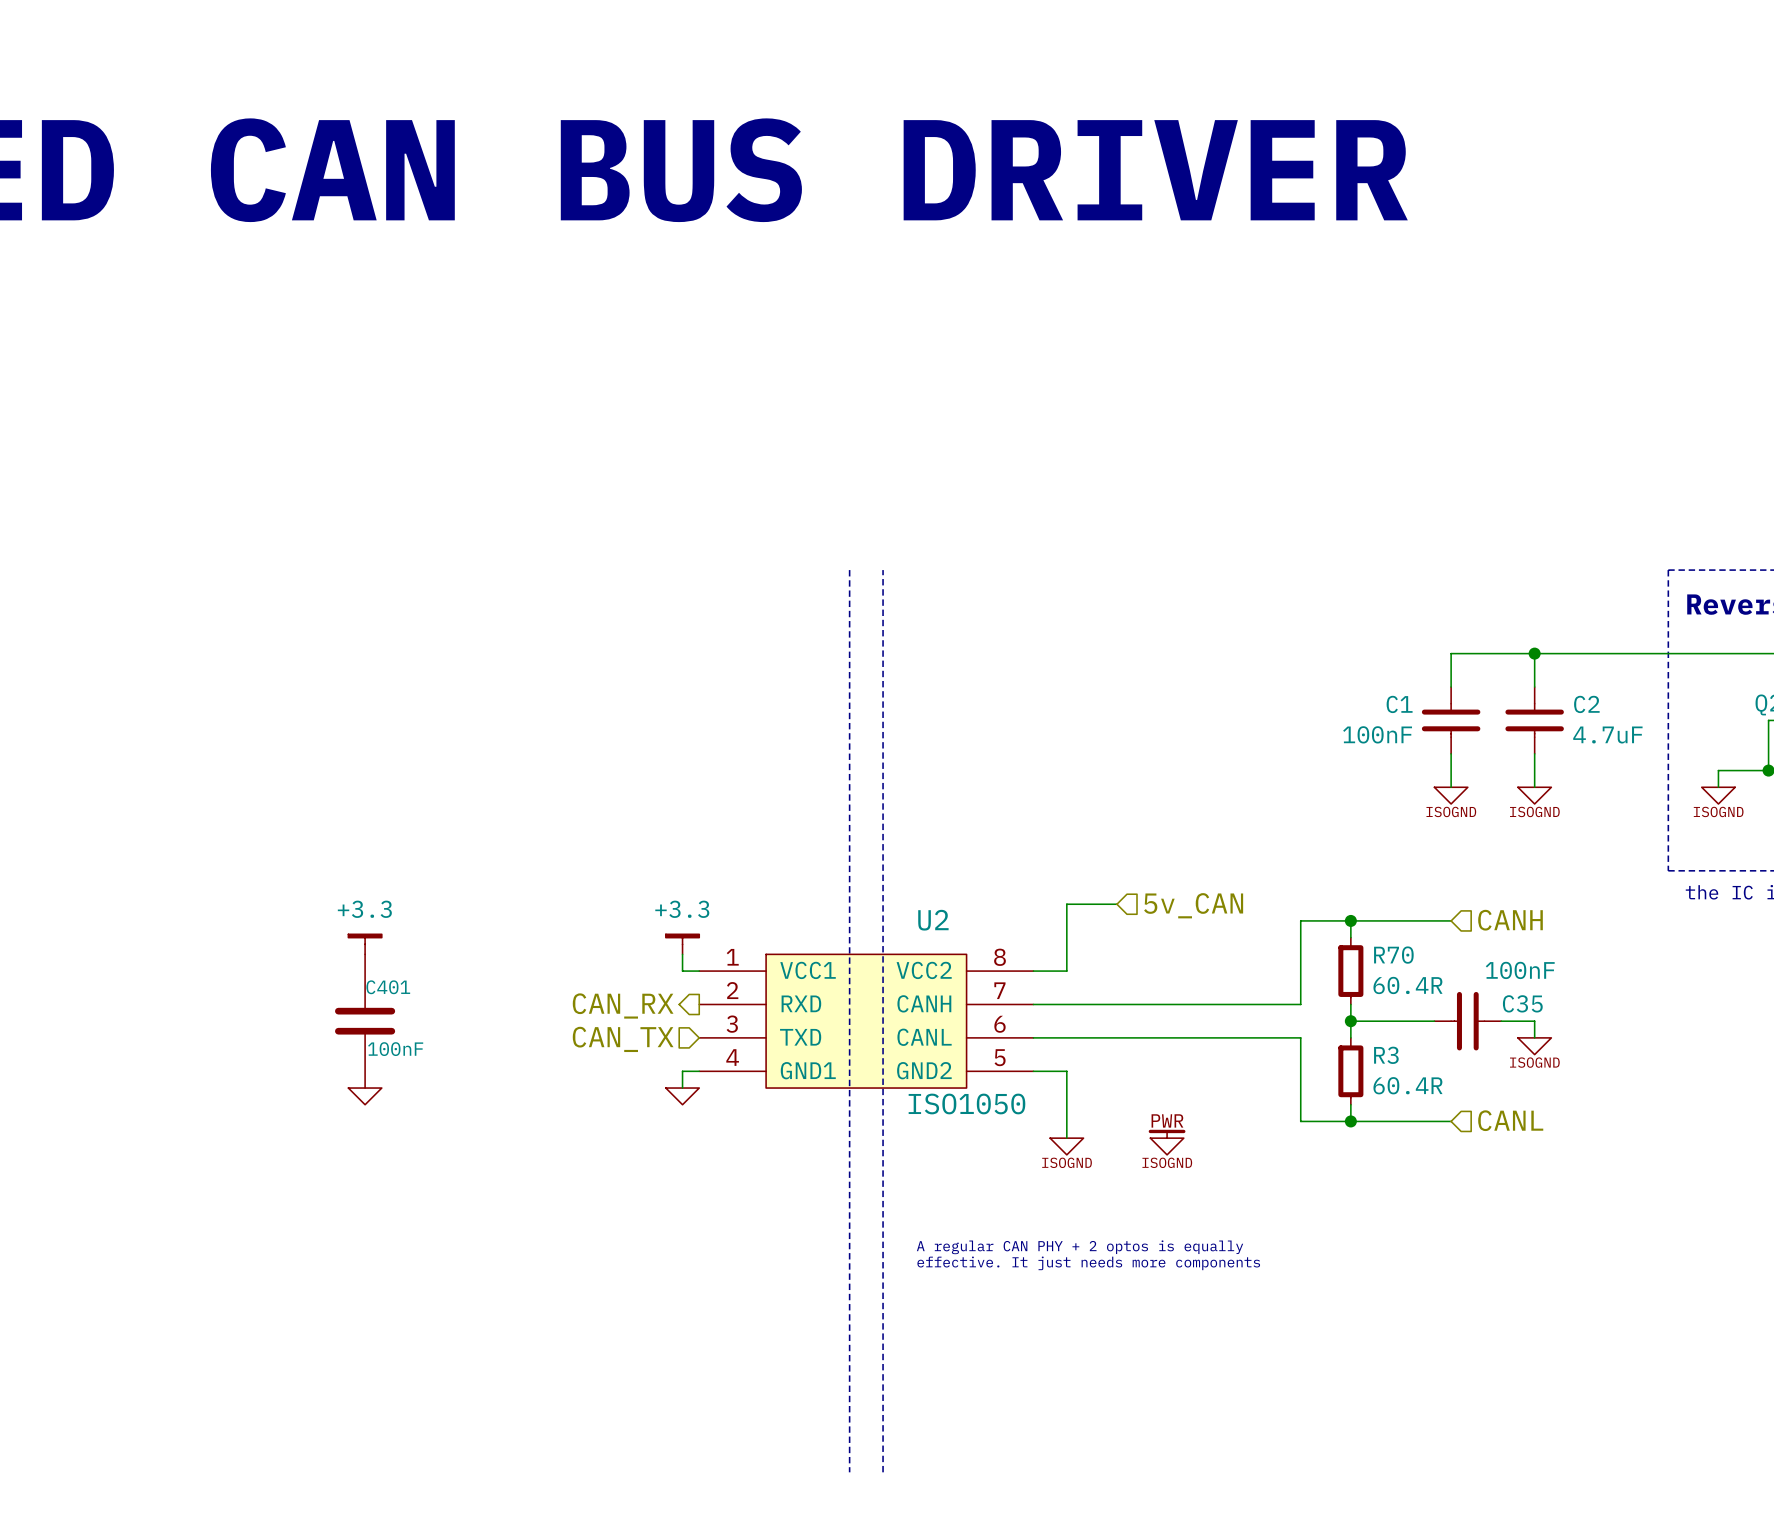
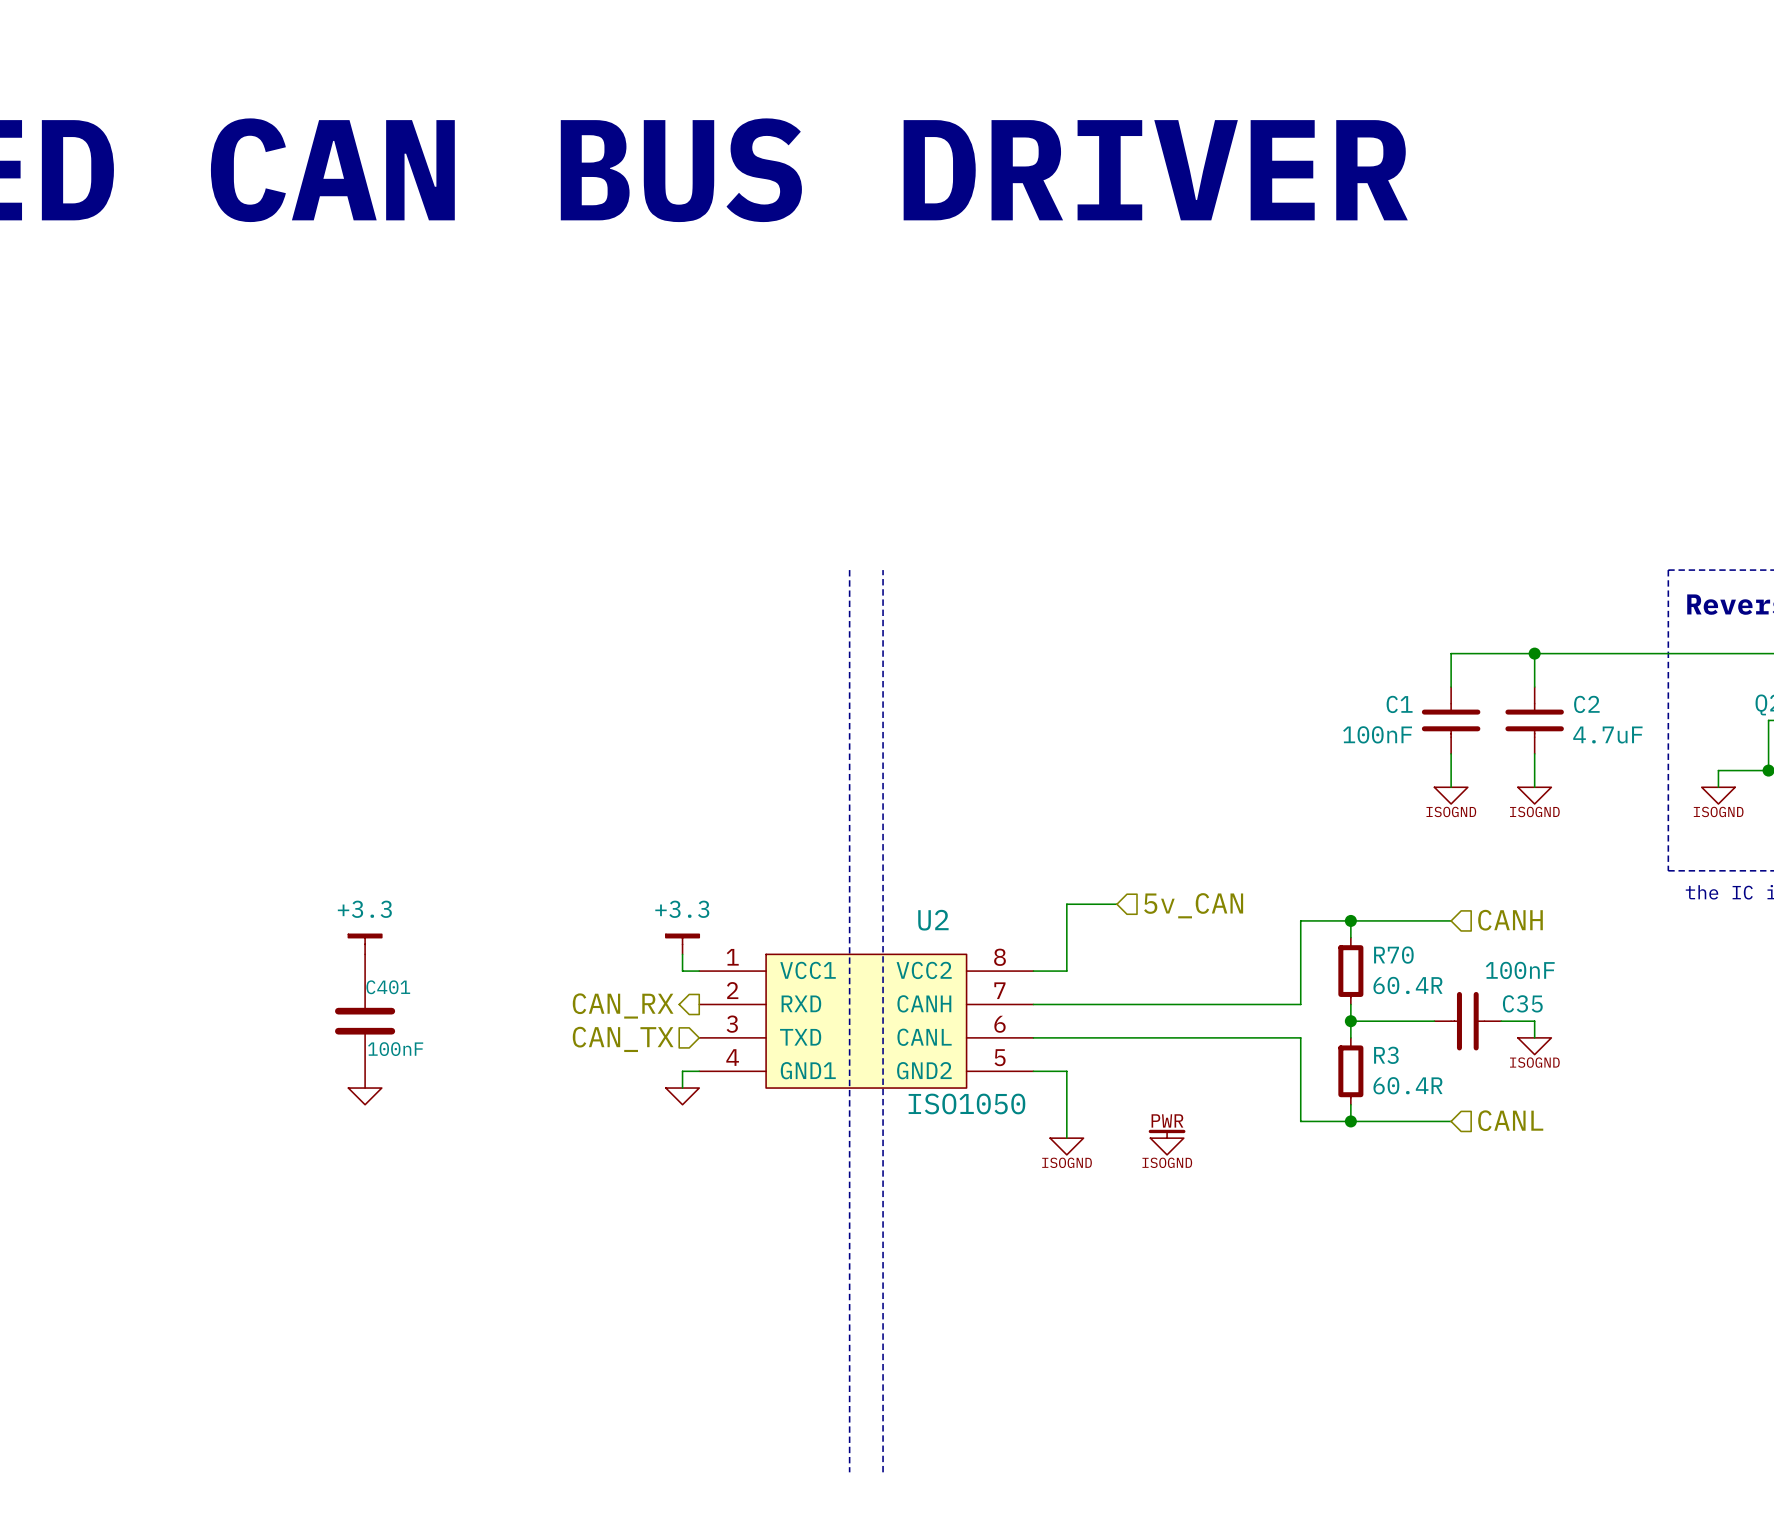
text: A regular CAN PHY + 2 optos is equally (1080, 1247) -> none
text: effective. It just needs more components (1088, 1263) -> none

